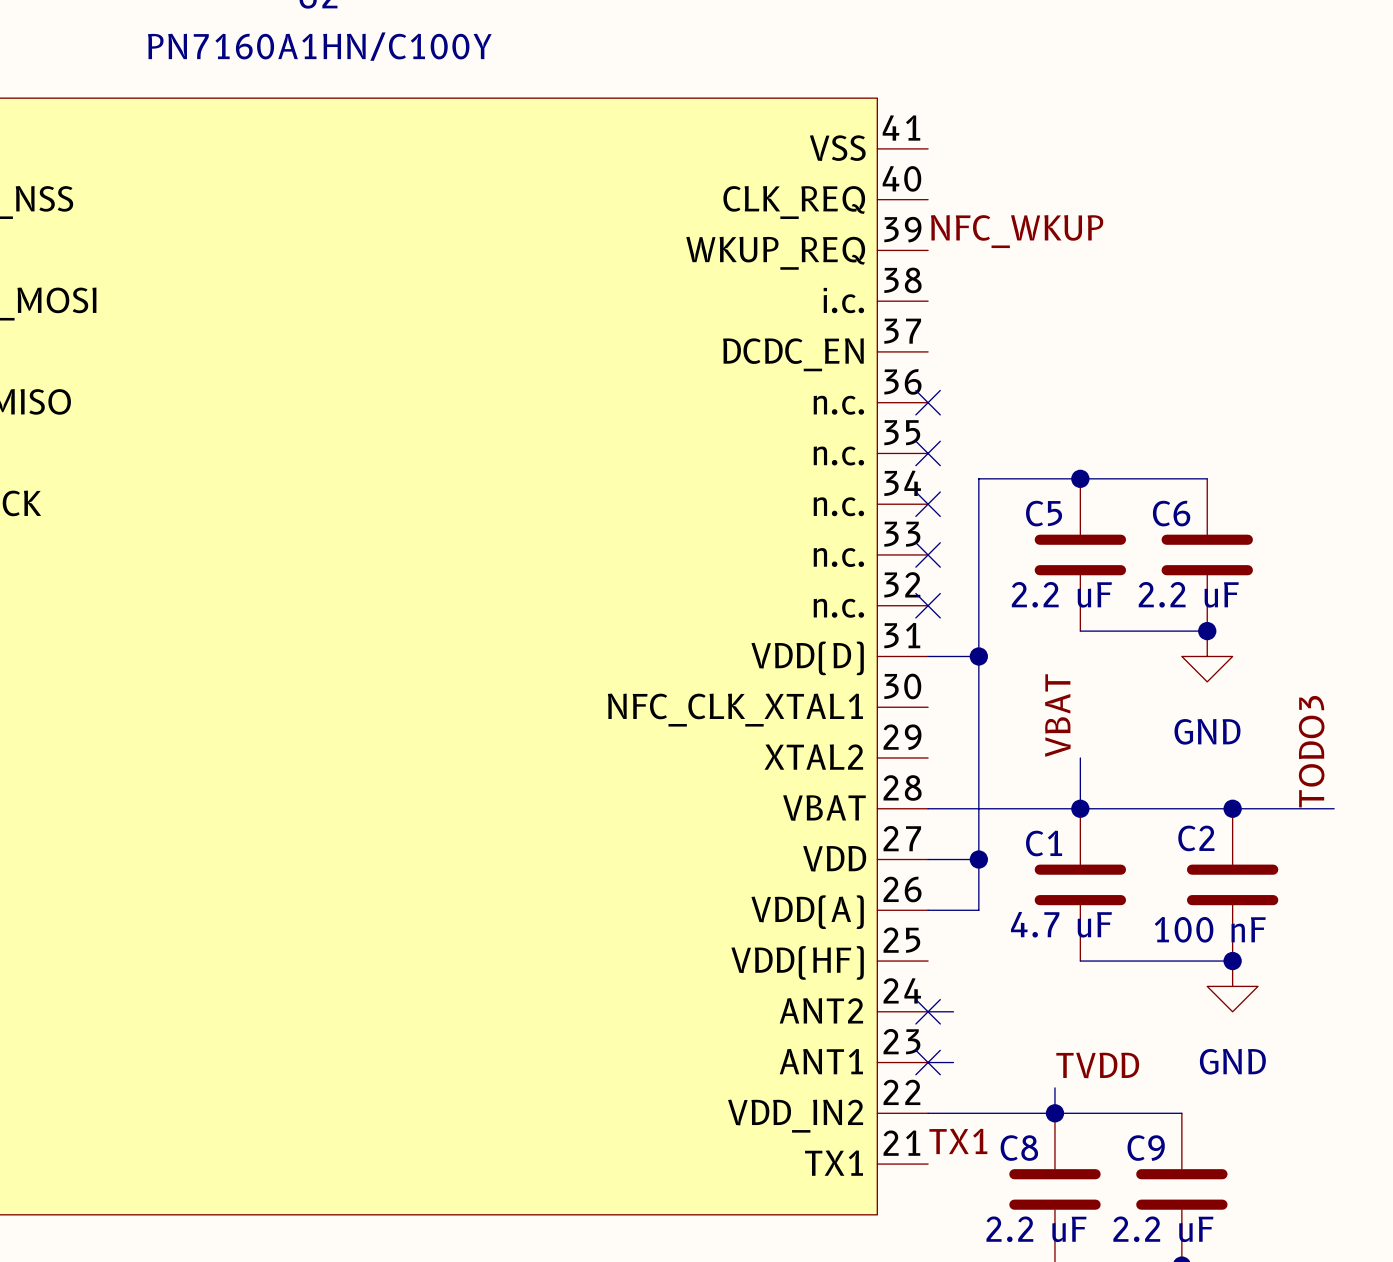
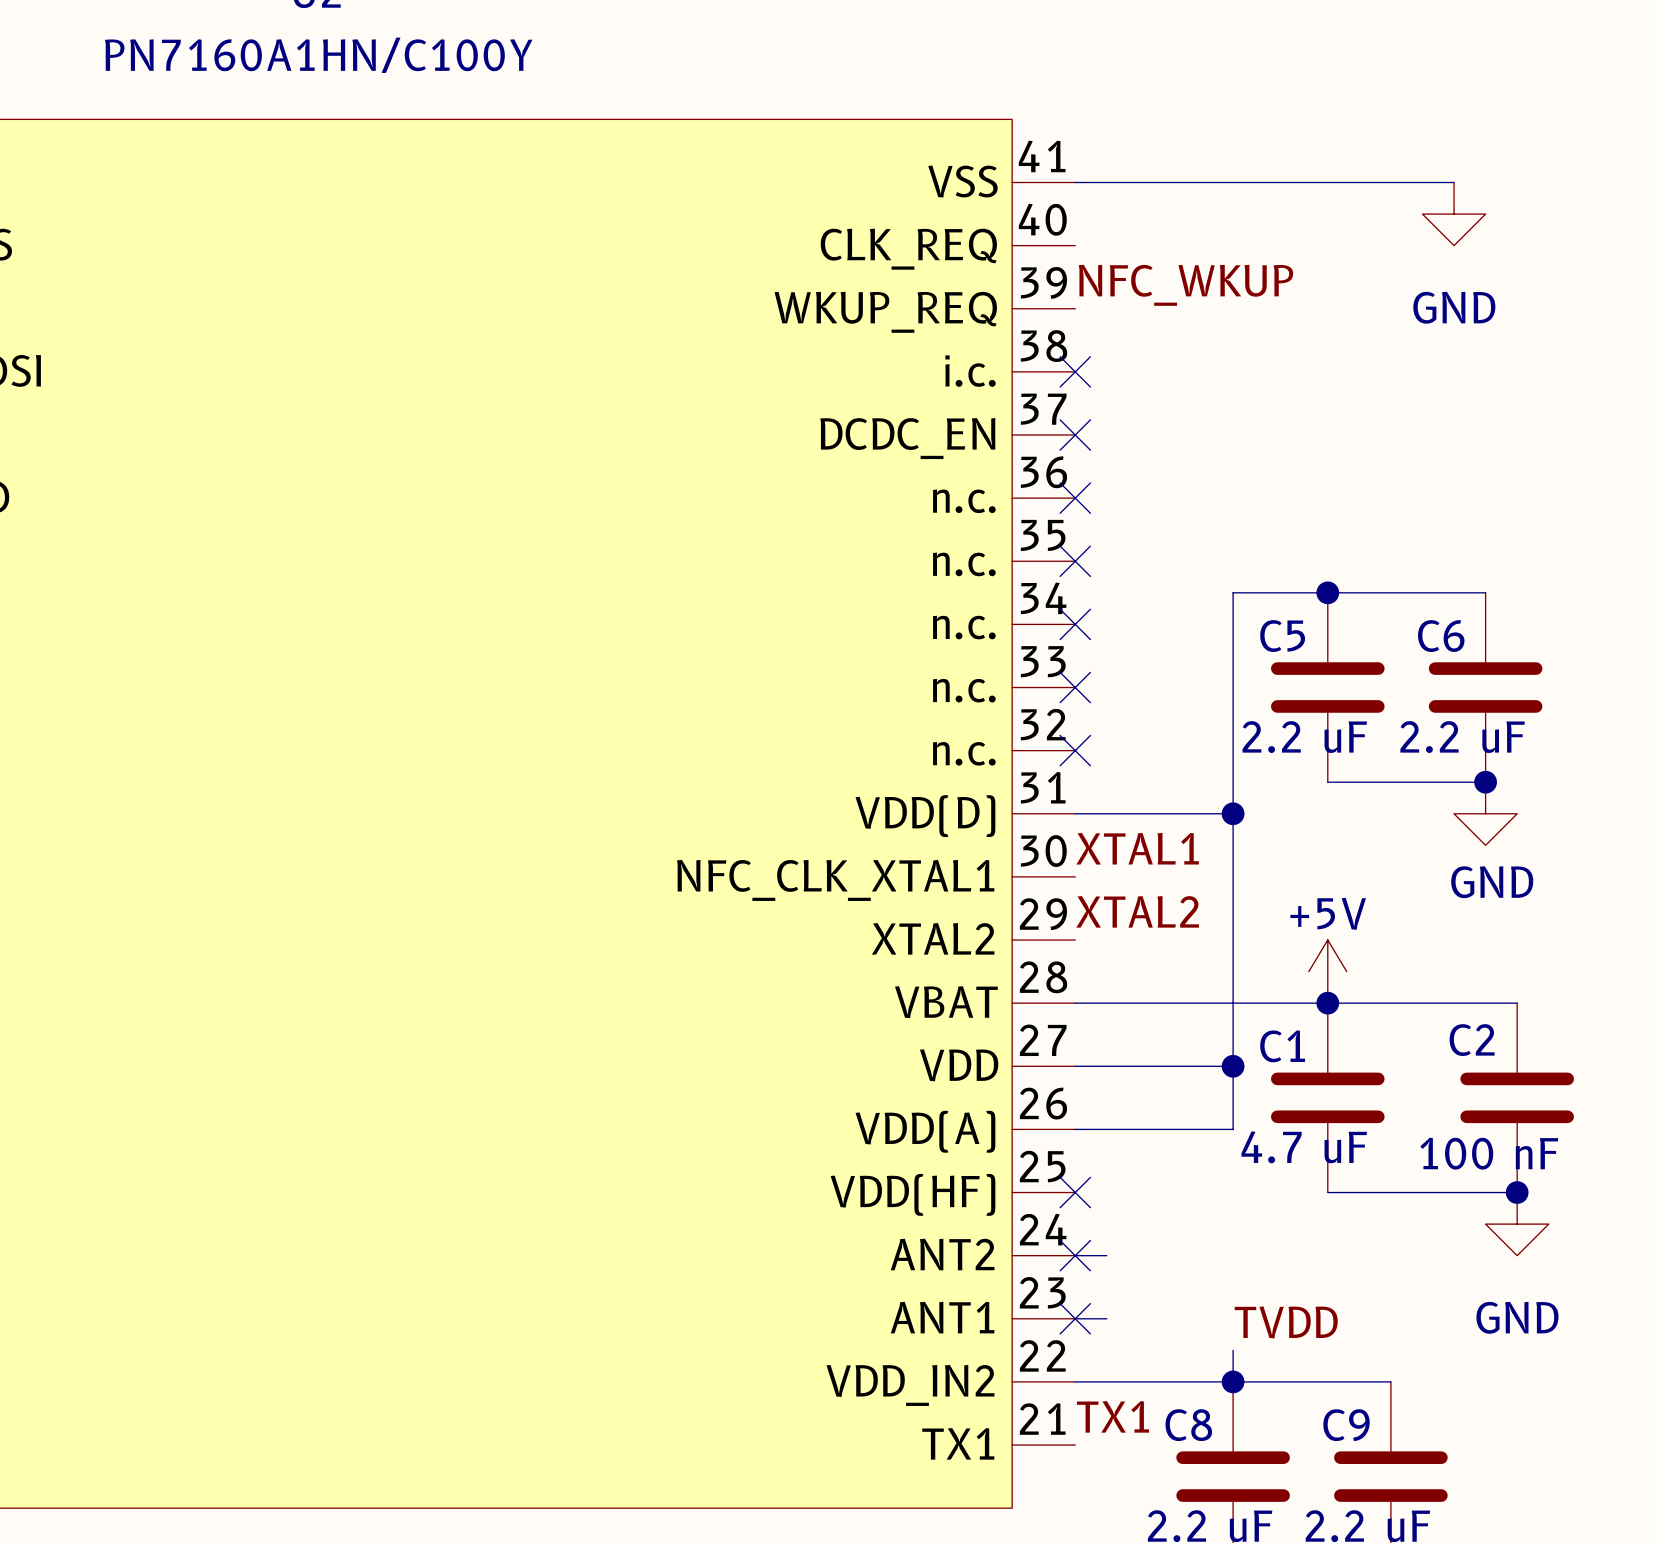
wire: none -> (1075, 182) (1454, 182)
power symbol: none -> GND (1454, 214)
no-connect mark: none -> (1075, 371)
no-connect mark: none -> (1075, 435)
wire: (1054, 478) (978, 478) (978, 910) -> (1233, 592) (1233, 1129) (1138, 1129)
junction position: (1080, 478) -> (1327, 592)
C5 position: (1080, 554) -> (1327, 687)
C6 position: (1207, 554) -> (1485, 687)
wire: (1080, 631) (1131, 631) -> (1422, 782) (1485, 782)
junction position: (1207, 631) -> (1485, 782)
wire: none -> (1138, 813) (1233, 813)
junction position: (978, 656) -> (1233, 813)
power symbol position: GND (1207, 656) -> GND (1485, 813)
label: none -> XTAL1 (1137, 848)
label: VBAT (1057, 715) -> none
power symbol text position: GND (1207, 731) -> GND (1492, 882)
label: none -> XTAL2 (1137, 911)
label: TODO3 (1311, 751) -> none
wire: (1080, 758) (1080, 808) -> none
power symbol: none -> +5V (1327, 971)
junction: (1080, 808) -> none
junction: none -> (1327, 1003)
junction: (1232, 808) -> none
wire: (1283, 808) (1334, 808) -> (1422, 592) (1485, 592)
wire: none -> (1138, 1066) (1233, 1066)
junction: (978, 859) -> none
junction: none -> (1233, 1066)
C1 position: (1080, 884) -> (1327, 1097)
C2 position: (1232, 884) -> (1517, 1097)
no-connect mark: none -> (1075, 1192)
wire: (1080, 961) (1131, 961) -> (1454, 1192) (1517, 1192)
junction position: (1232, 961) -> (1517, 1192)
power symbol position: GND (1232, 986) -> GND (1517, 1224)

